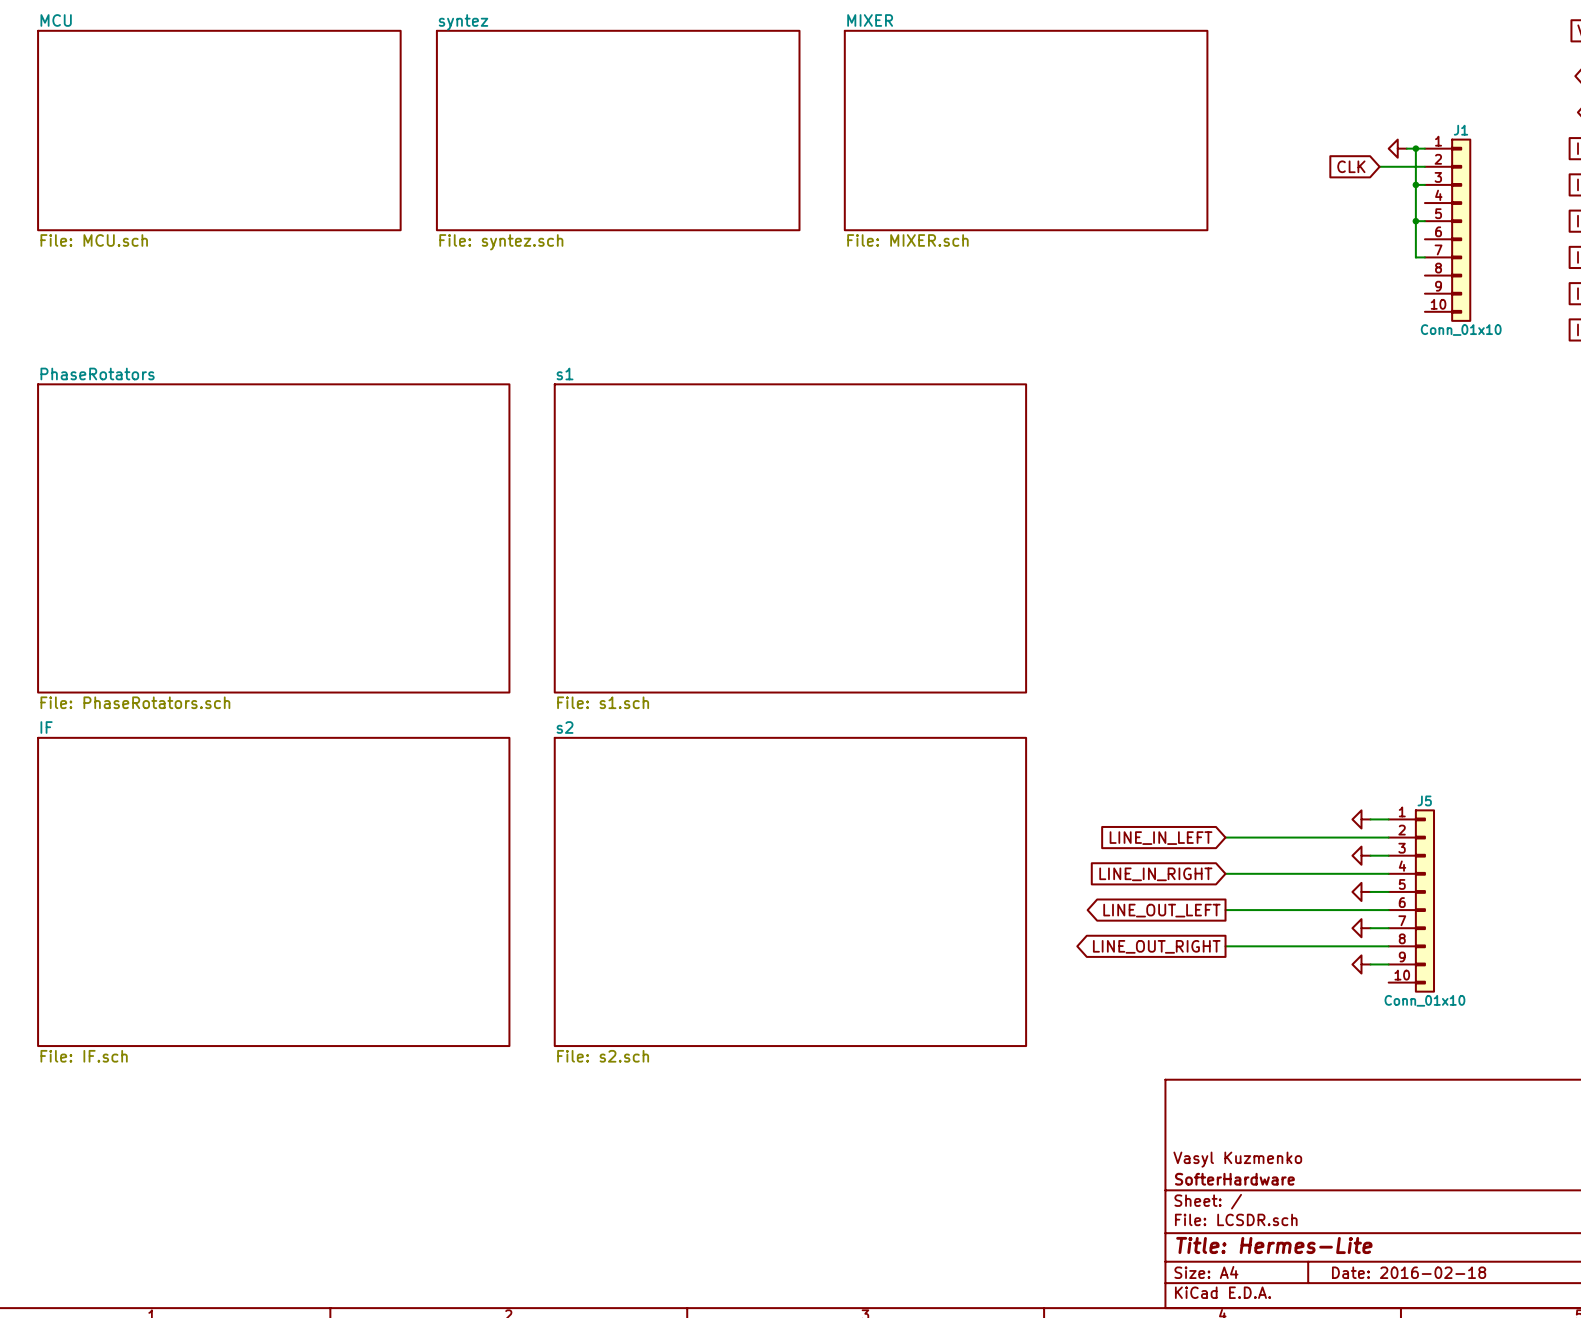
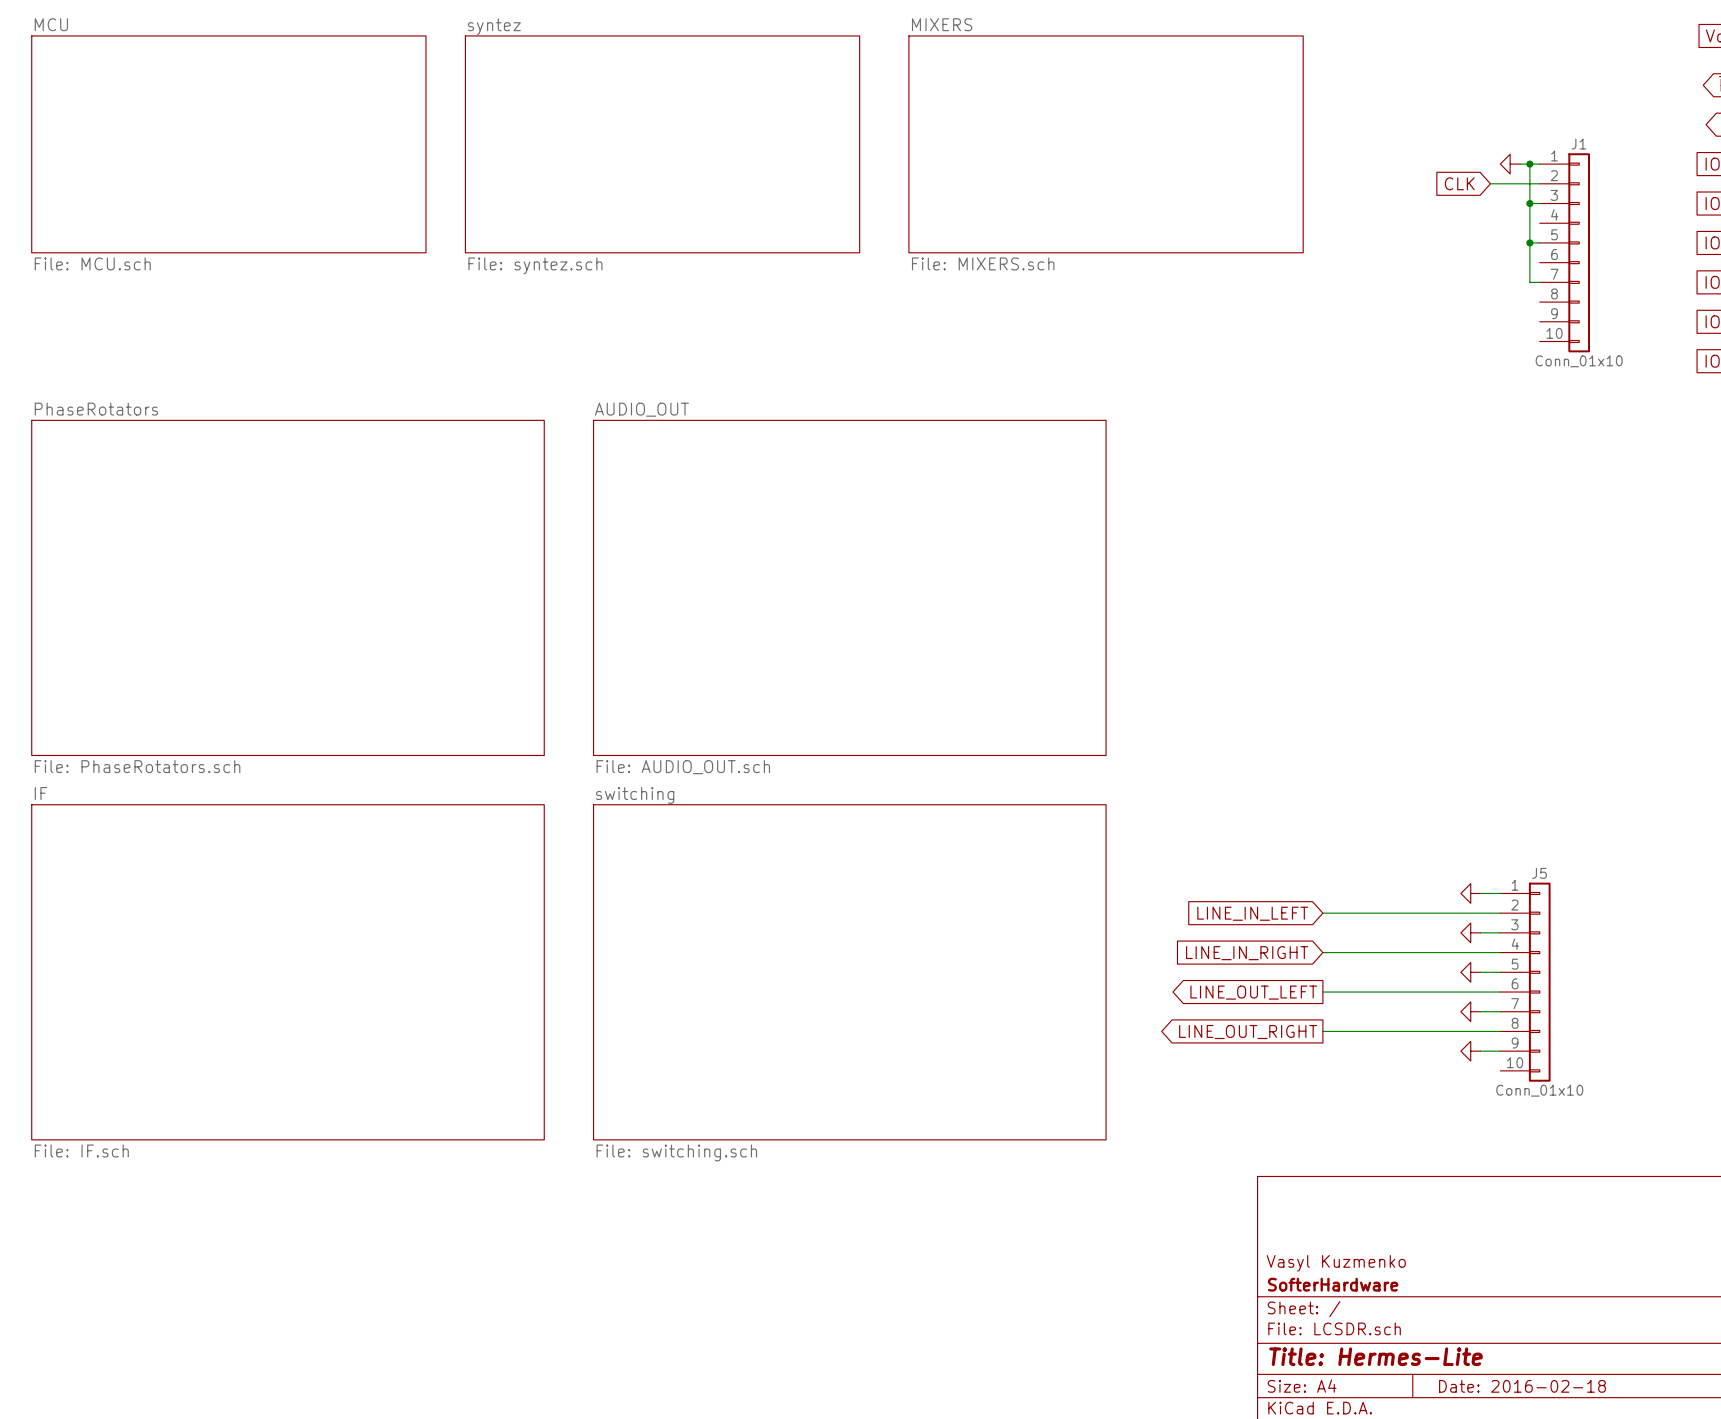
sheet MIXER name: MIXER (870, 20) -> MIXERS (942, 24)
sheet MIXER value: File: MIXER.sch (907, 240) -> File: MIXERS.sch (983, 263)
sheet s1 name: s1 (565, 373) -> AUDIO_OUT (641, 409)
sheet s1 value: File: s1.sch (603, 702) -> File: AUDIO_OUT.sch (683, 767)
sheet s2 name: s2 (565, 727) -> switching (635, 795)
sheet s2 value: File: s2.sch (603, 1056) -> File: switching.sch (676, 1152)

